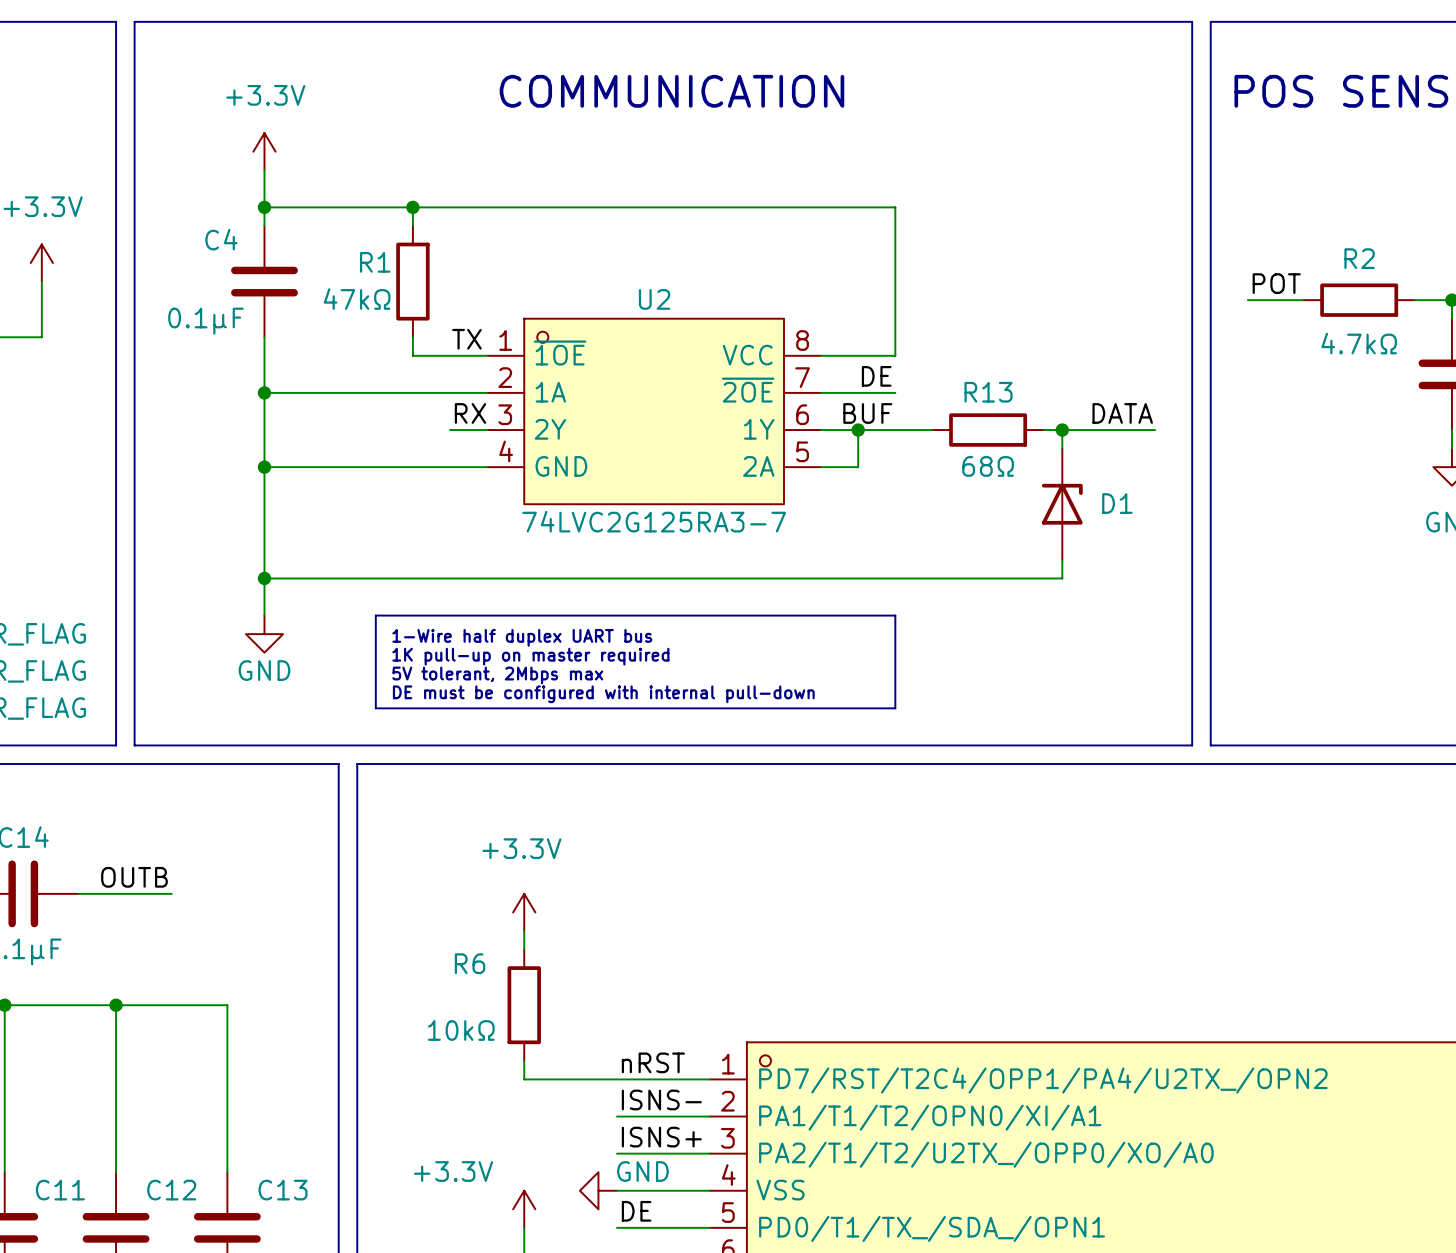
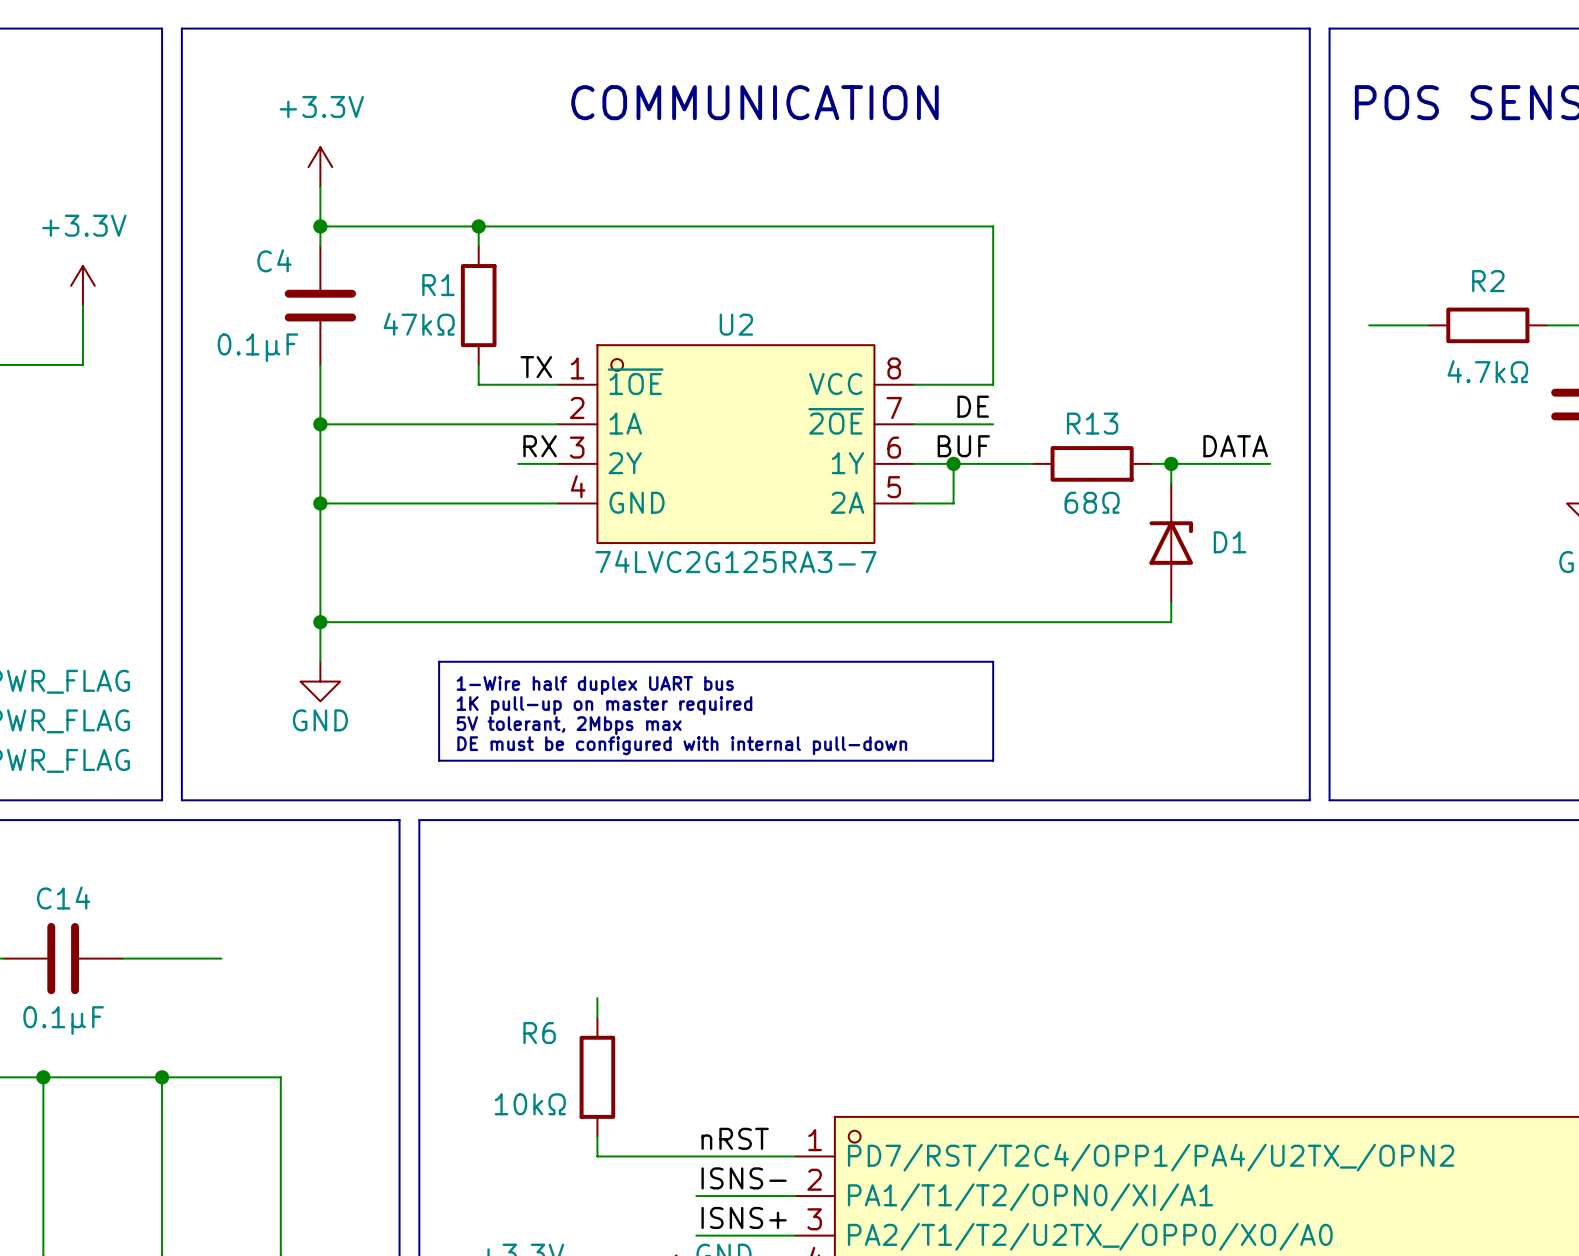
label: POT (1276, 283) -> none
label: OUTB (134, 877) -> none
power symbol: +3.3V (524, 912) -> none

